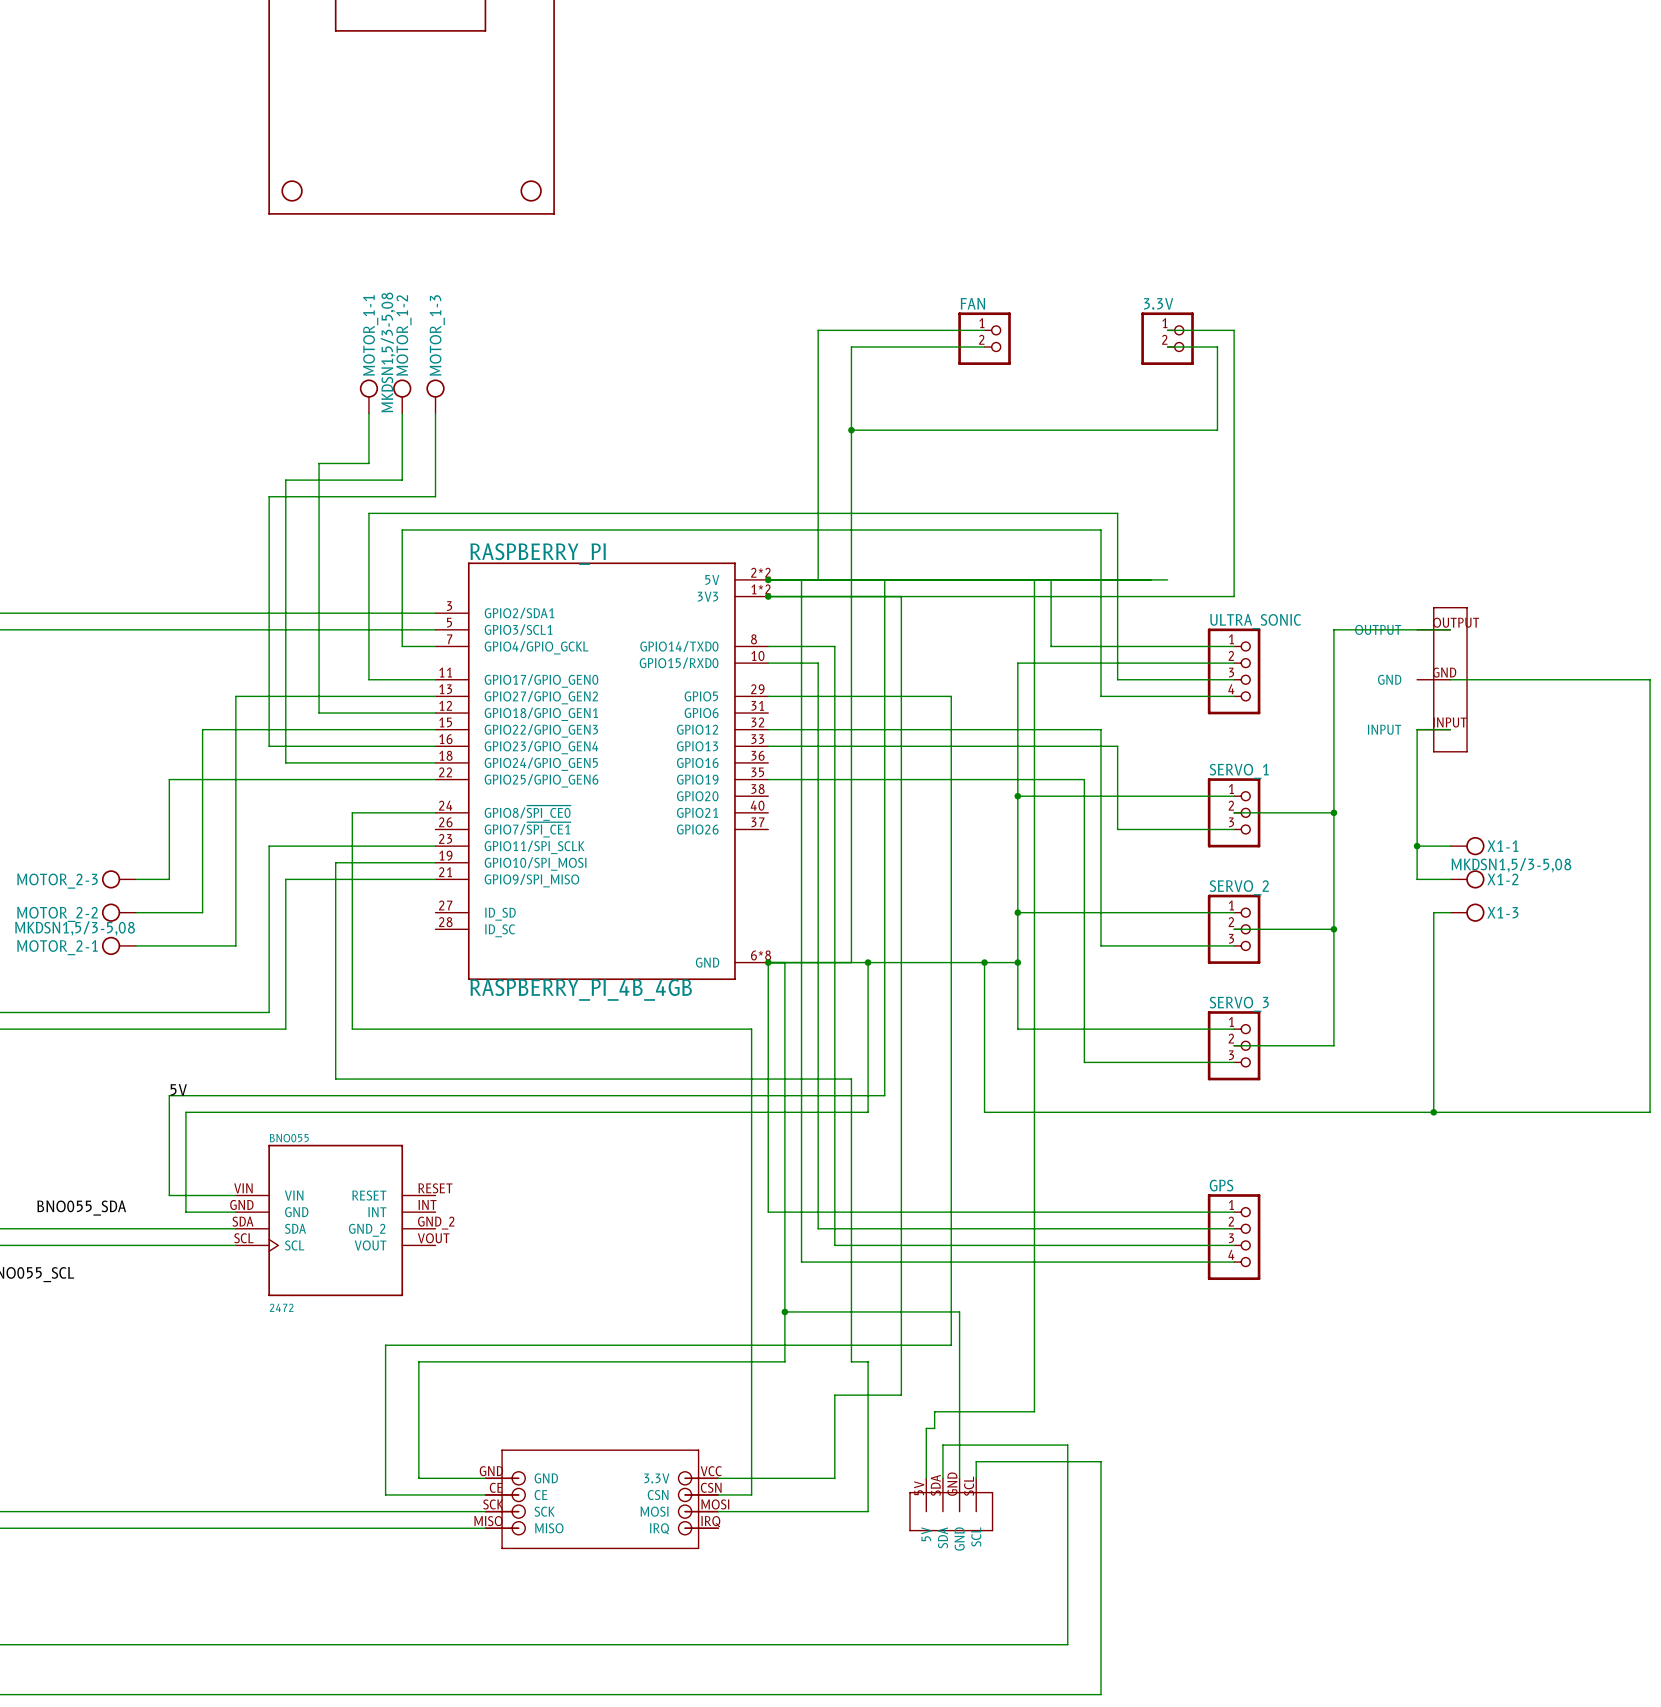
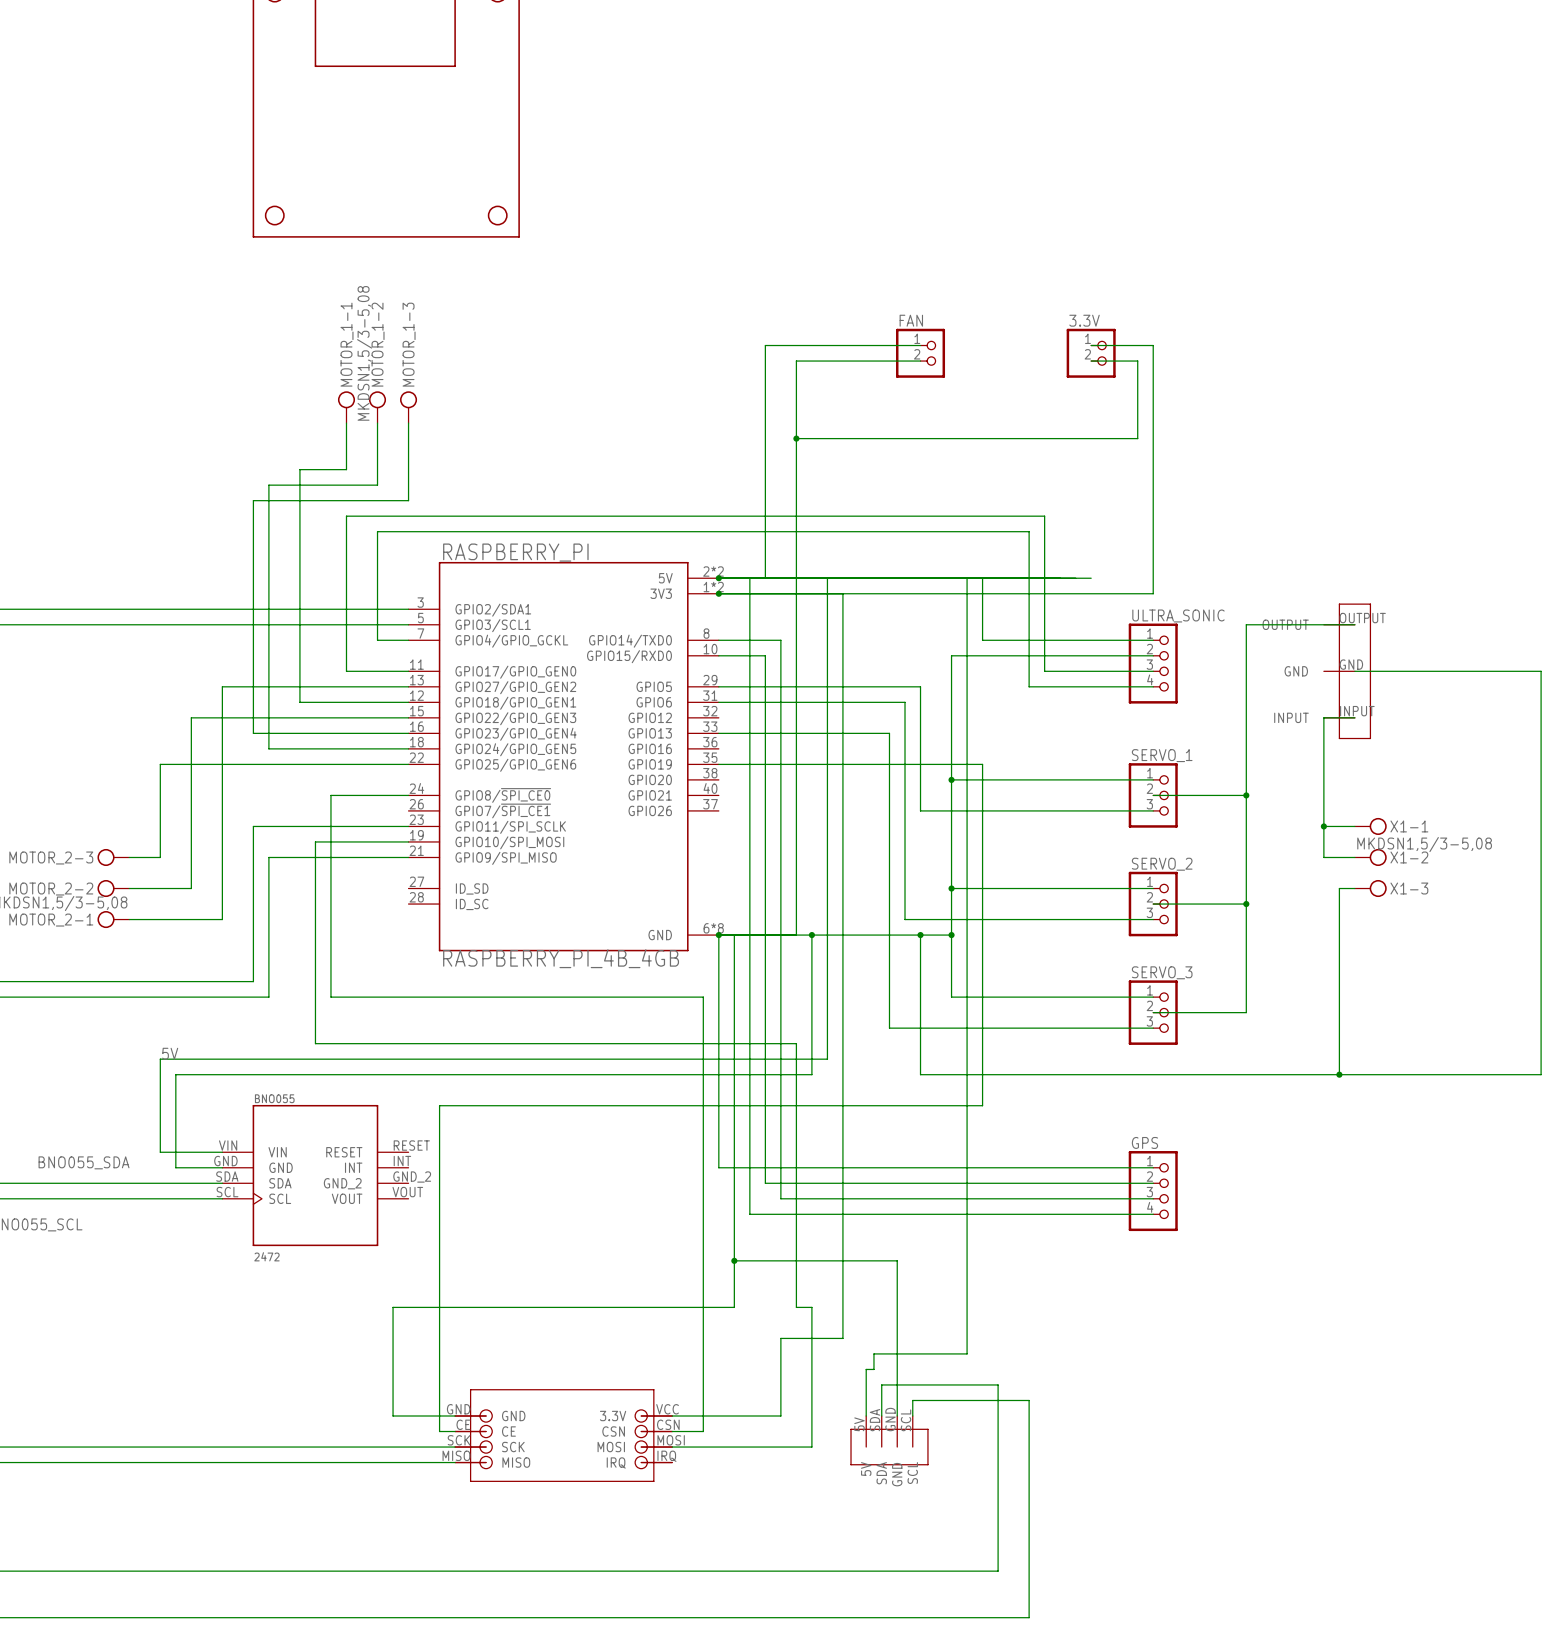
wire: (951, 696) (951, 746) (1117, 746) (1117, 829) -> (889, 686) (920, 686) (920, 810) (1044, 810)
wire: (768, 729) (1101, 729) (1101, 945) -> (718, 702) (905, 702) (905, 919) (1029, 919)
wire: (1051, 779) (1084, 779) (1084, 1062) -> (889, 1028) (1013, 1028)
wire: (951, 1062) (951, 1345) (385, 1345) (385, 1494) (468, 1494) -> (982, 764) (982, 1105) (439, 1105) (439, 1431)

